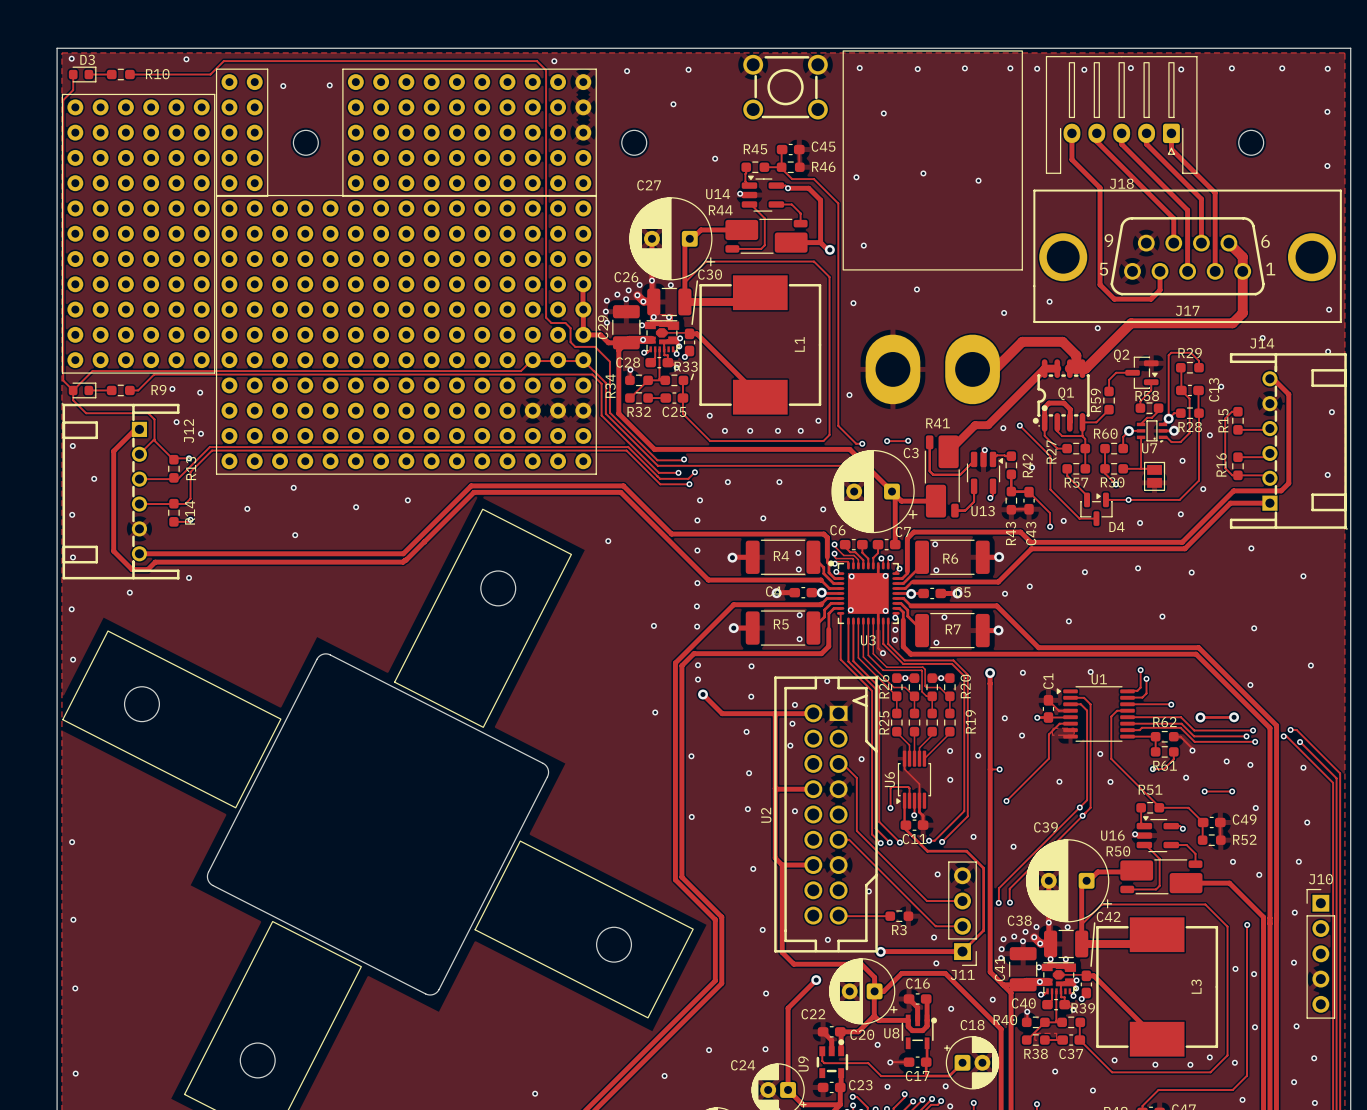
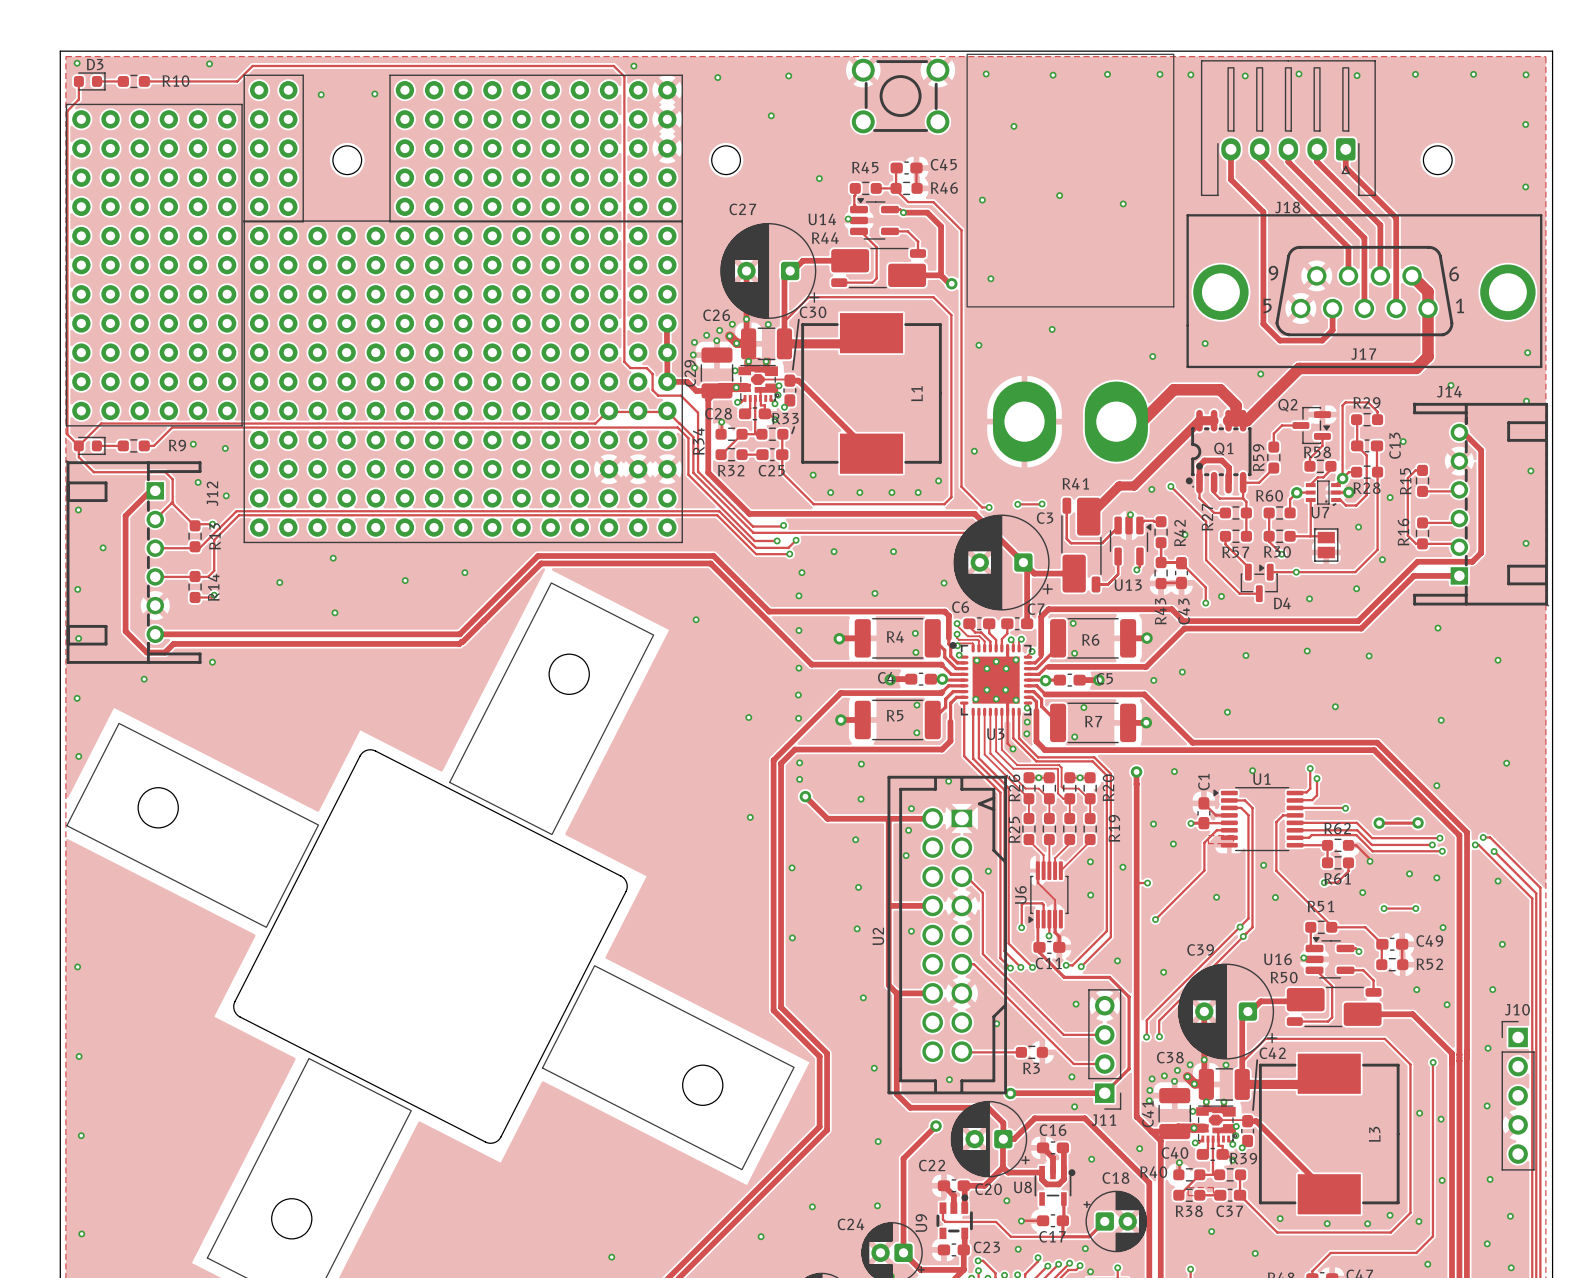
via: none -> (996, 661)
via: none -> (986, 668)
via: none -> (1006, 668)
via: none -> (986, 689)
via: none -> (1005, 689)
via: none -> (996, 698)

